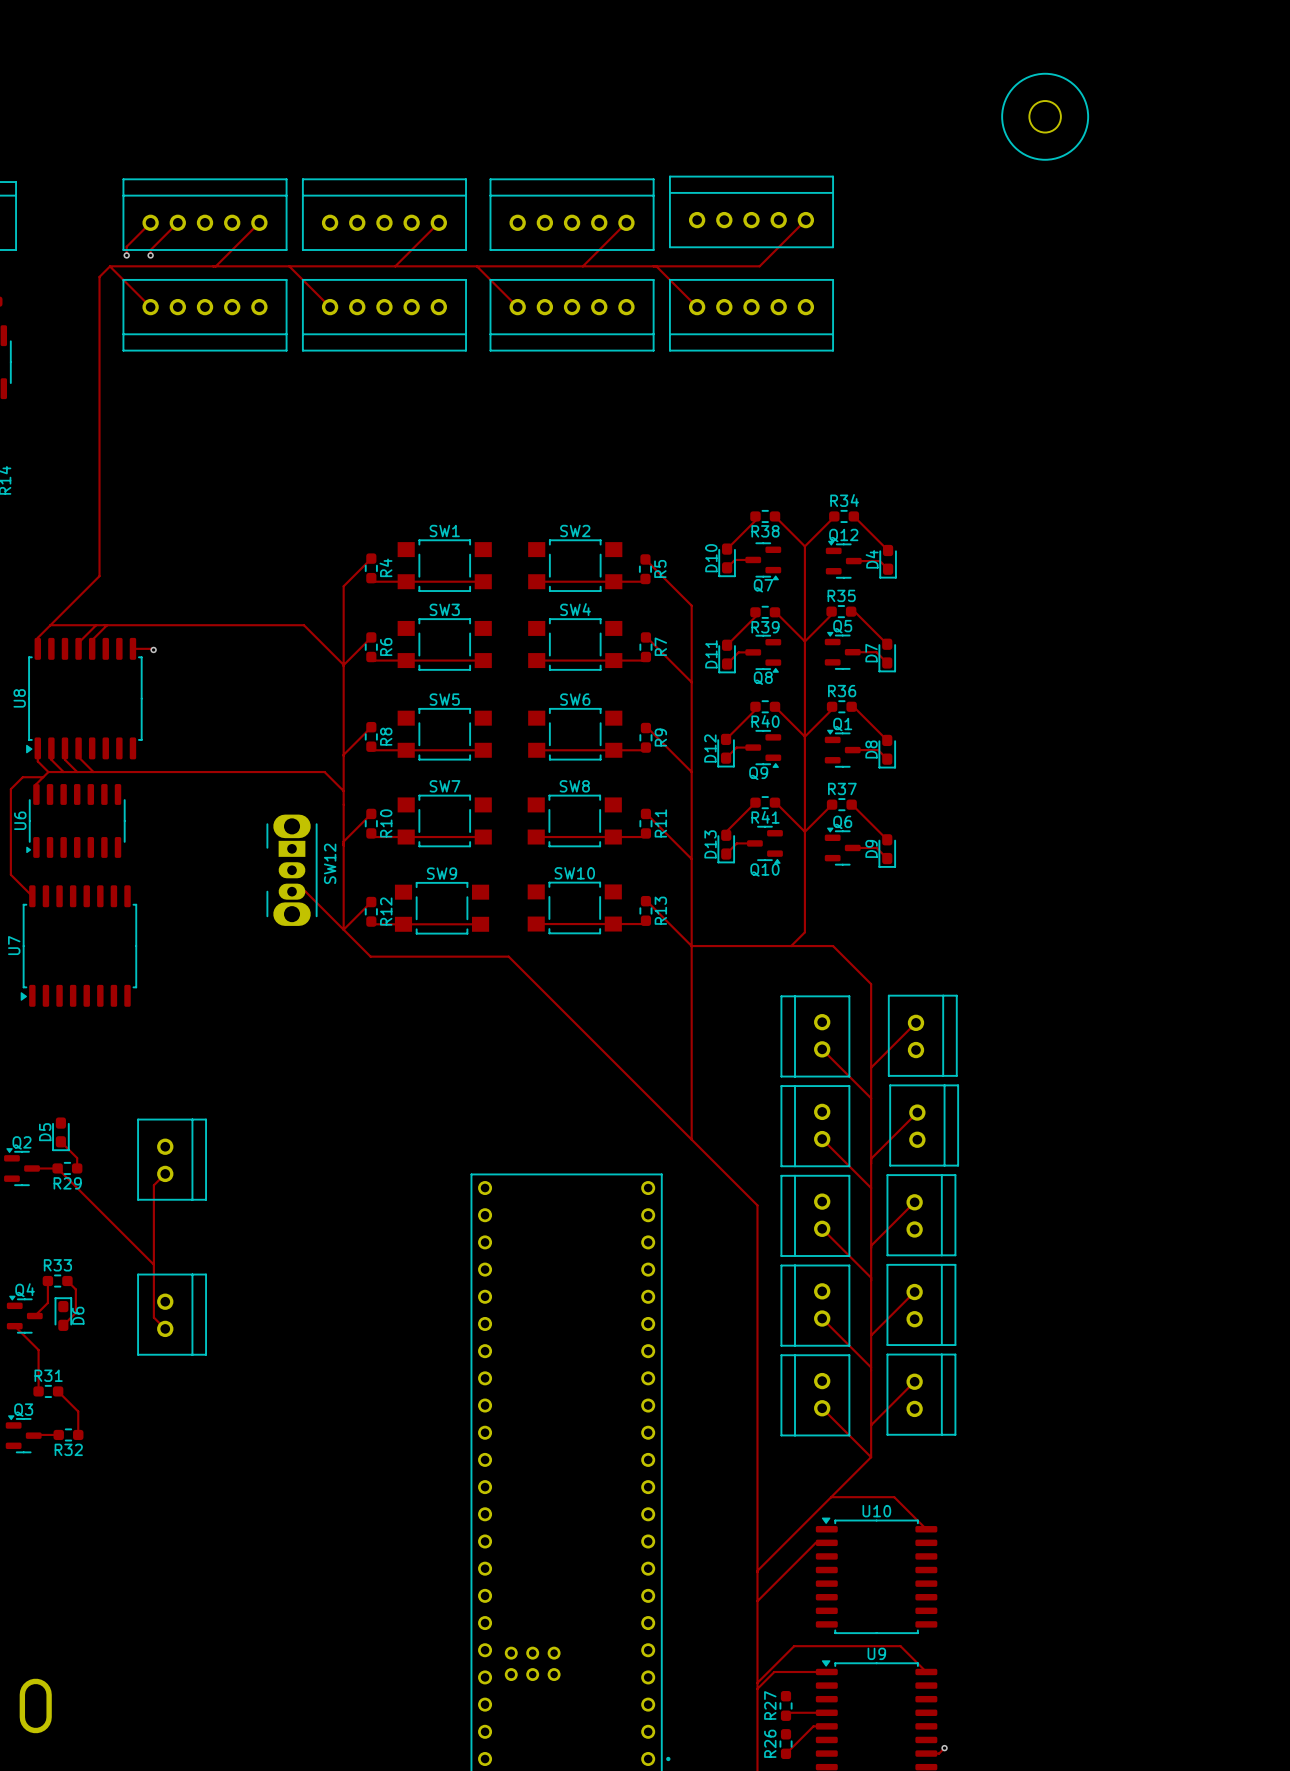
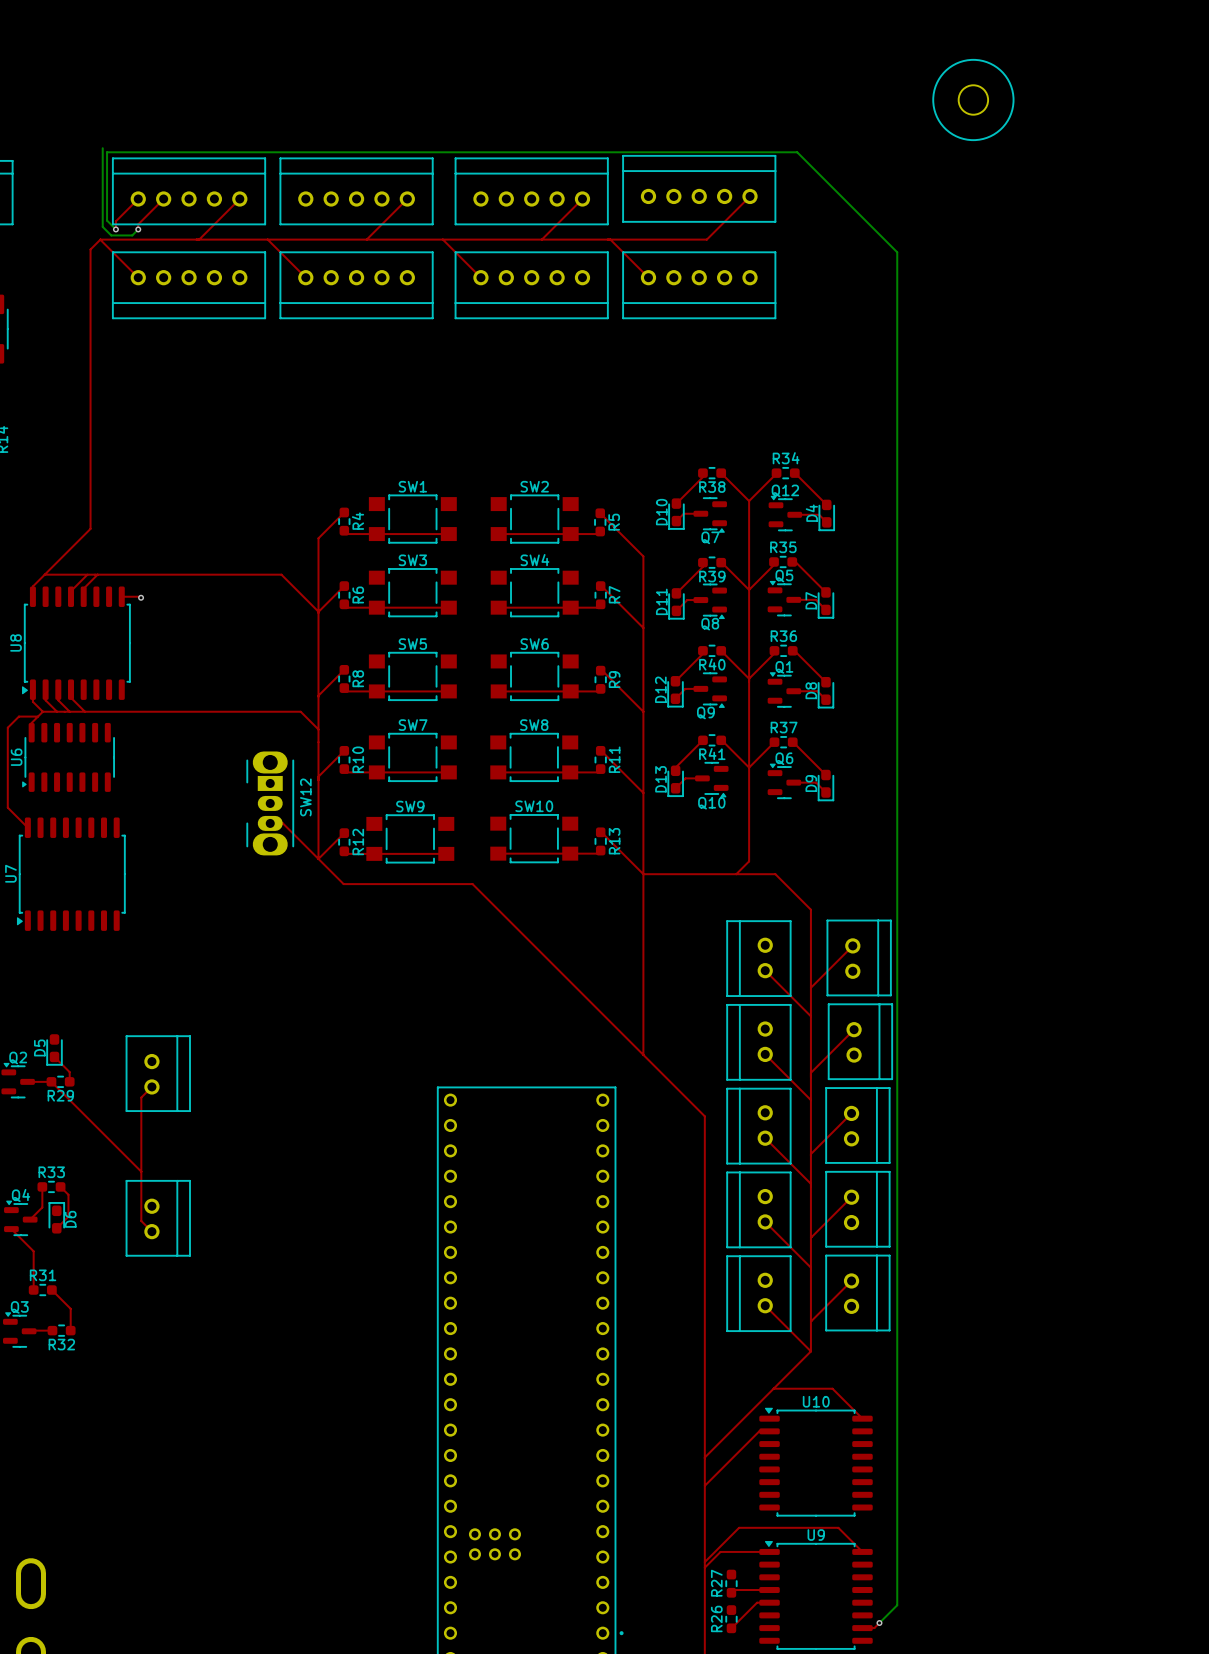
bottom track: none -> (102, 148) (102, 226) (111, 235) (132, 235) (138, 229)
bottom track: none -> (115, 229) (107, 220) (107, 152) (797, 152) (897, 252) (897, 1605) (879, 1623)

